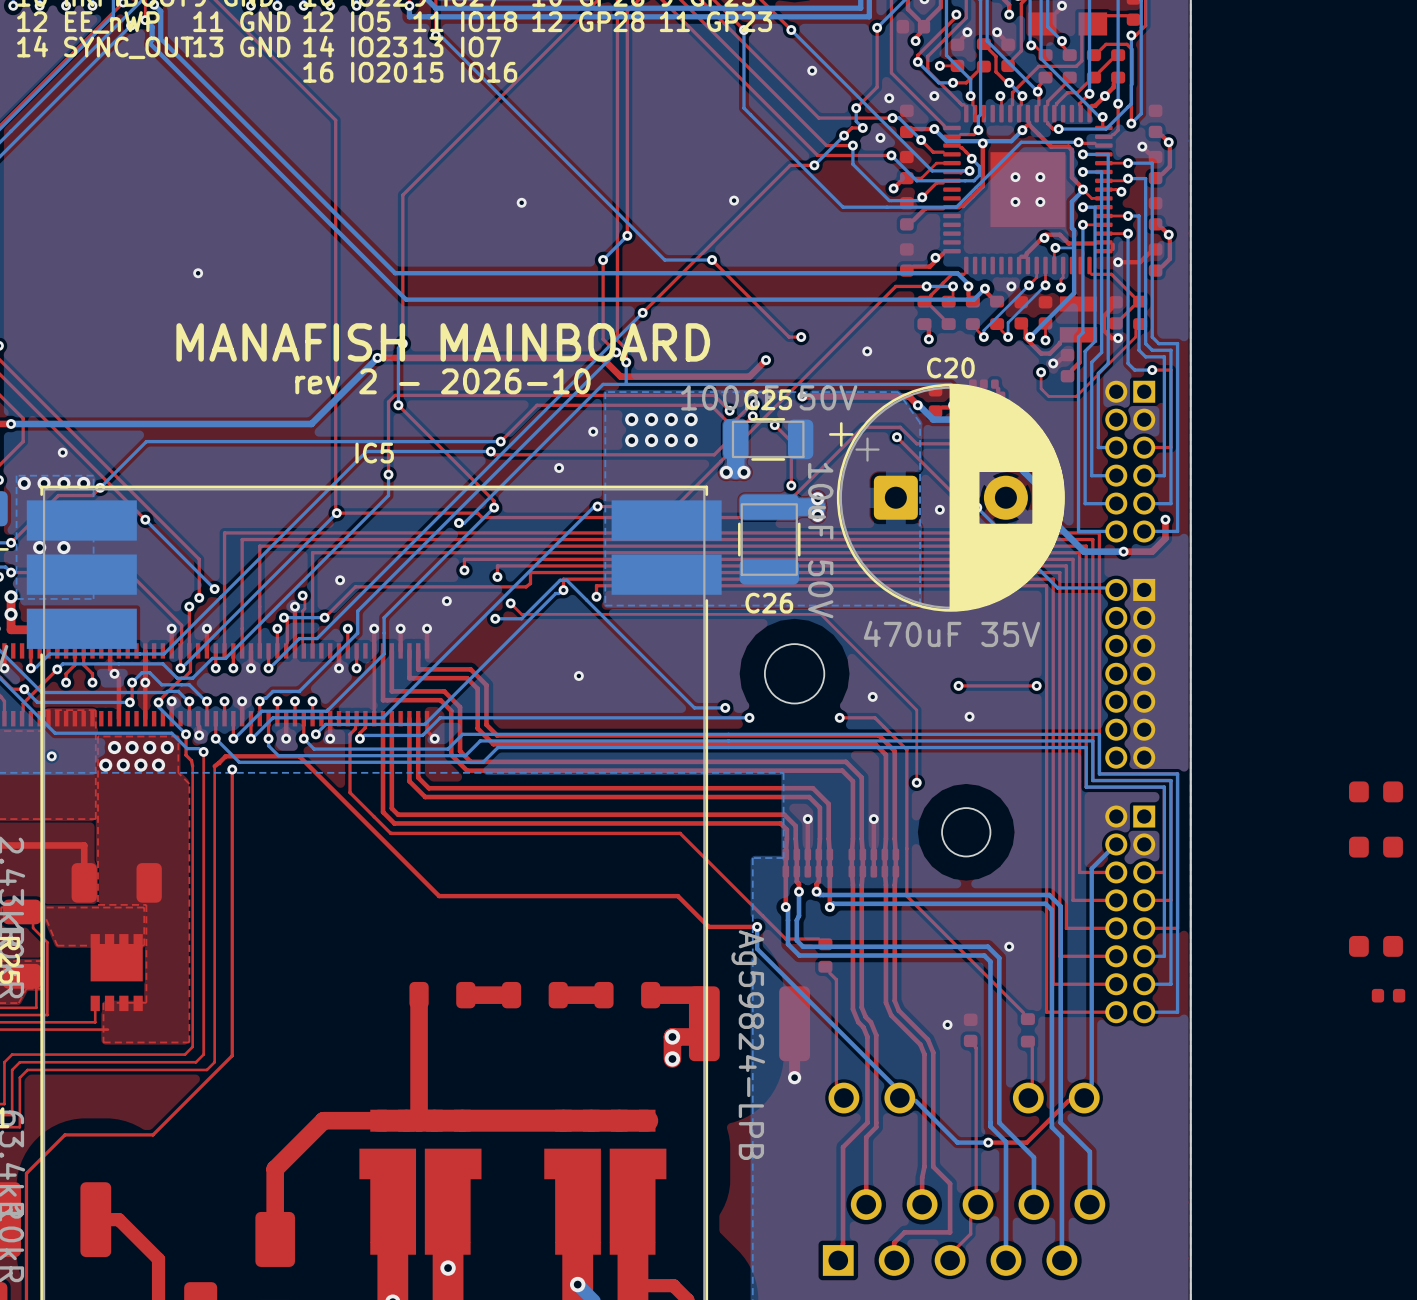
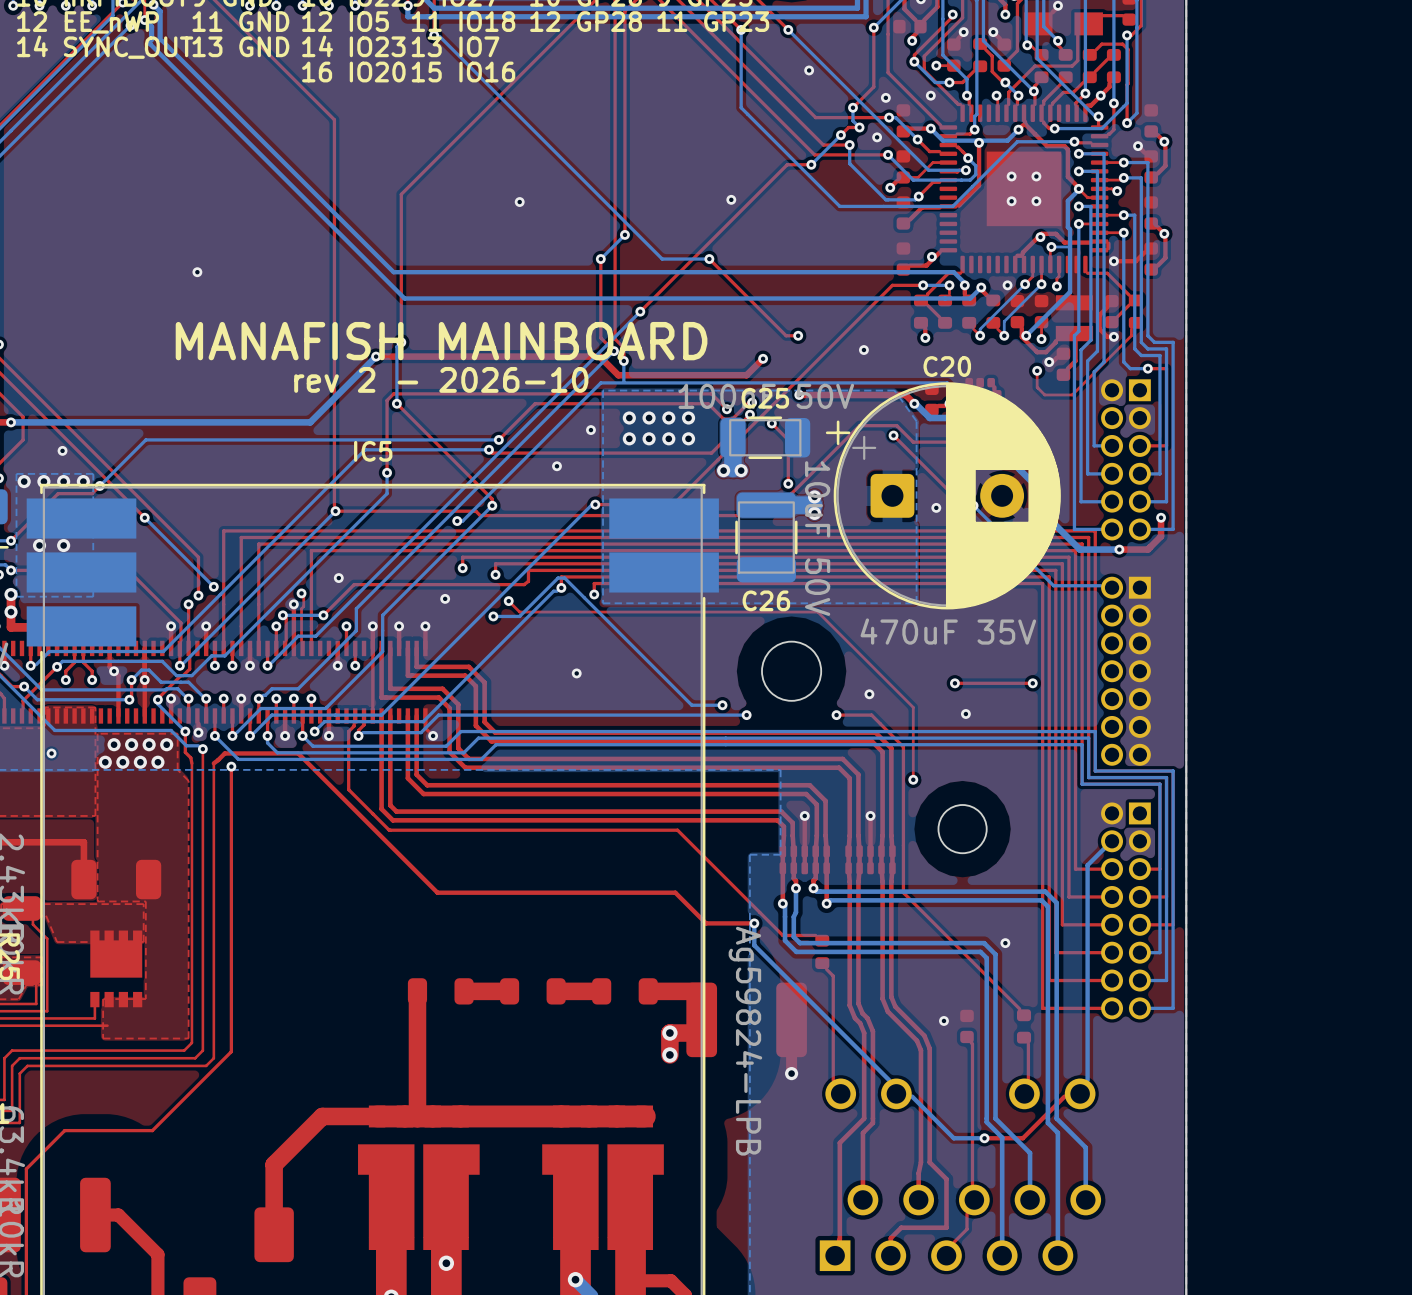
part: (1375, 791) -> none
part: (1375, 847) -> none
part: (1375, 946) -> none
part: (1388, 995) -> none

